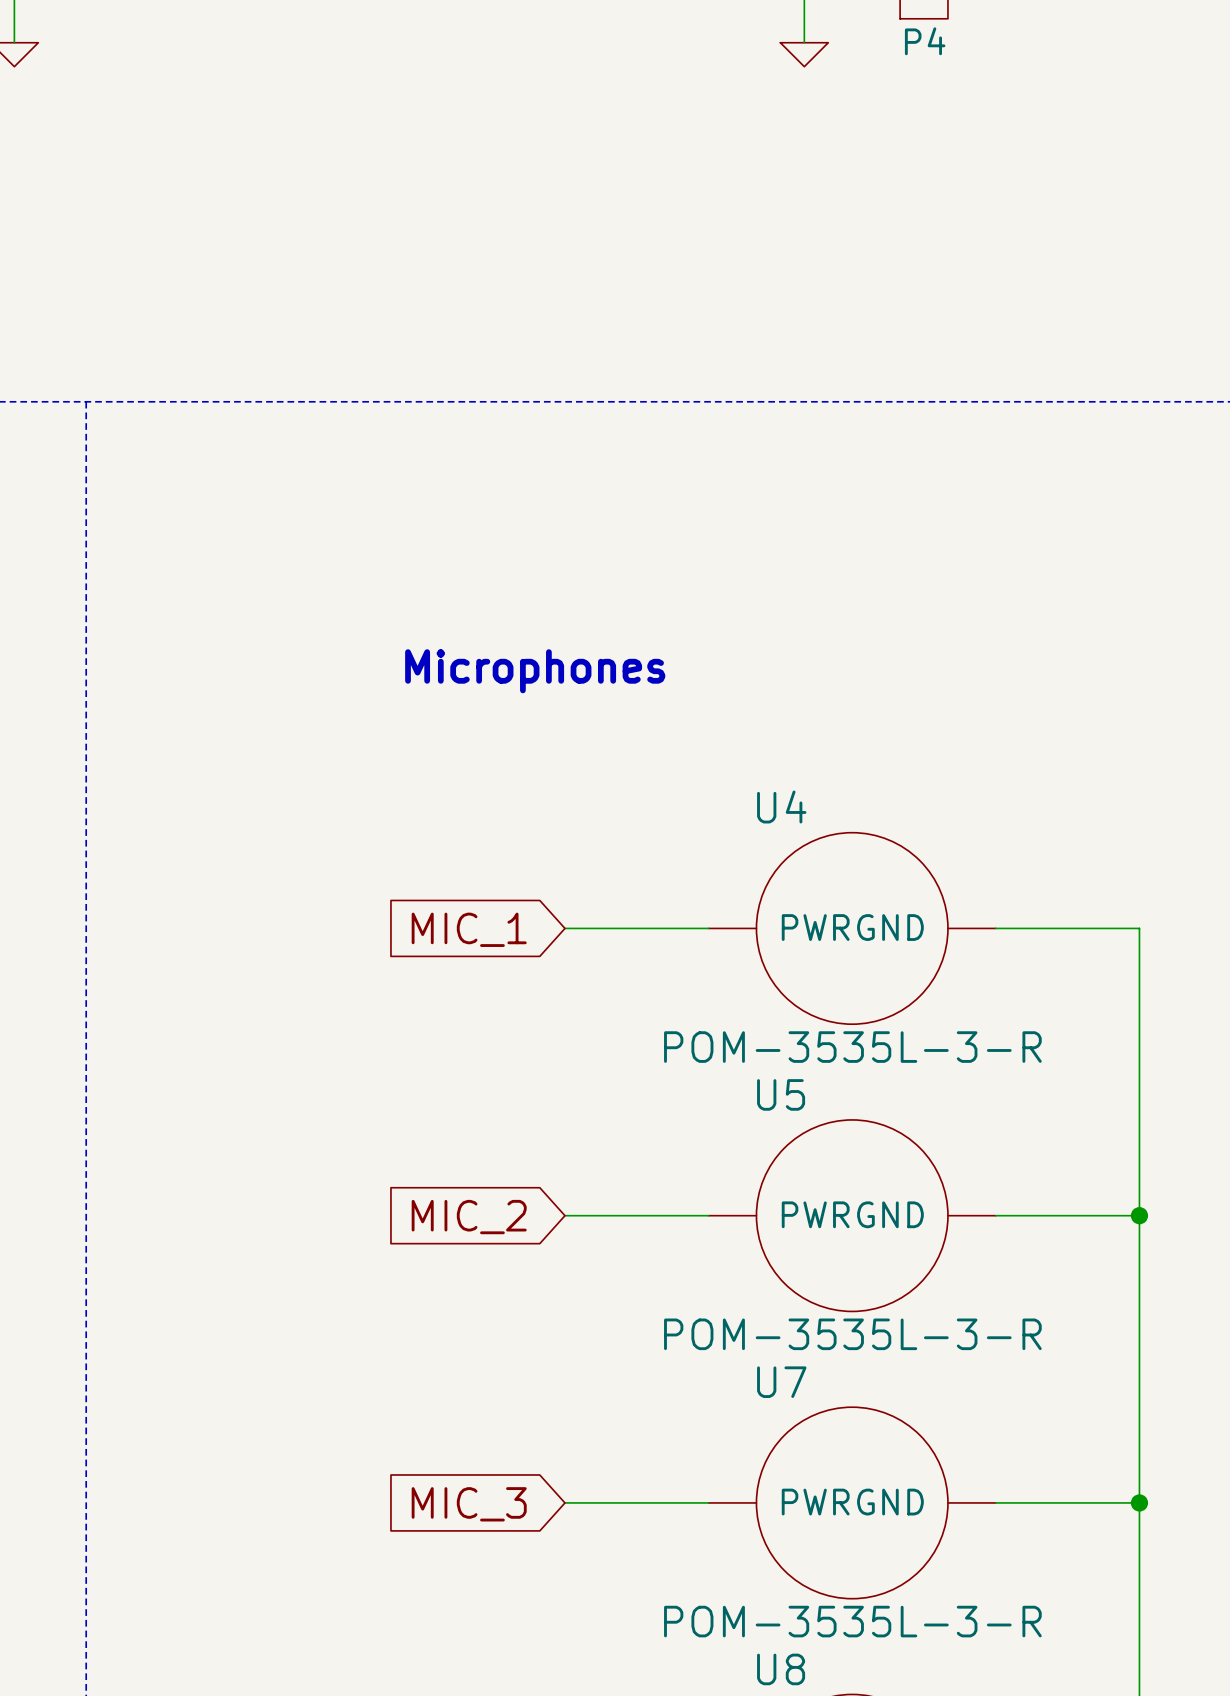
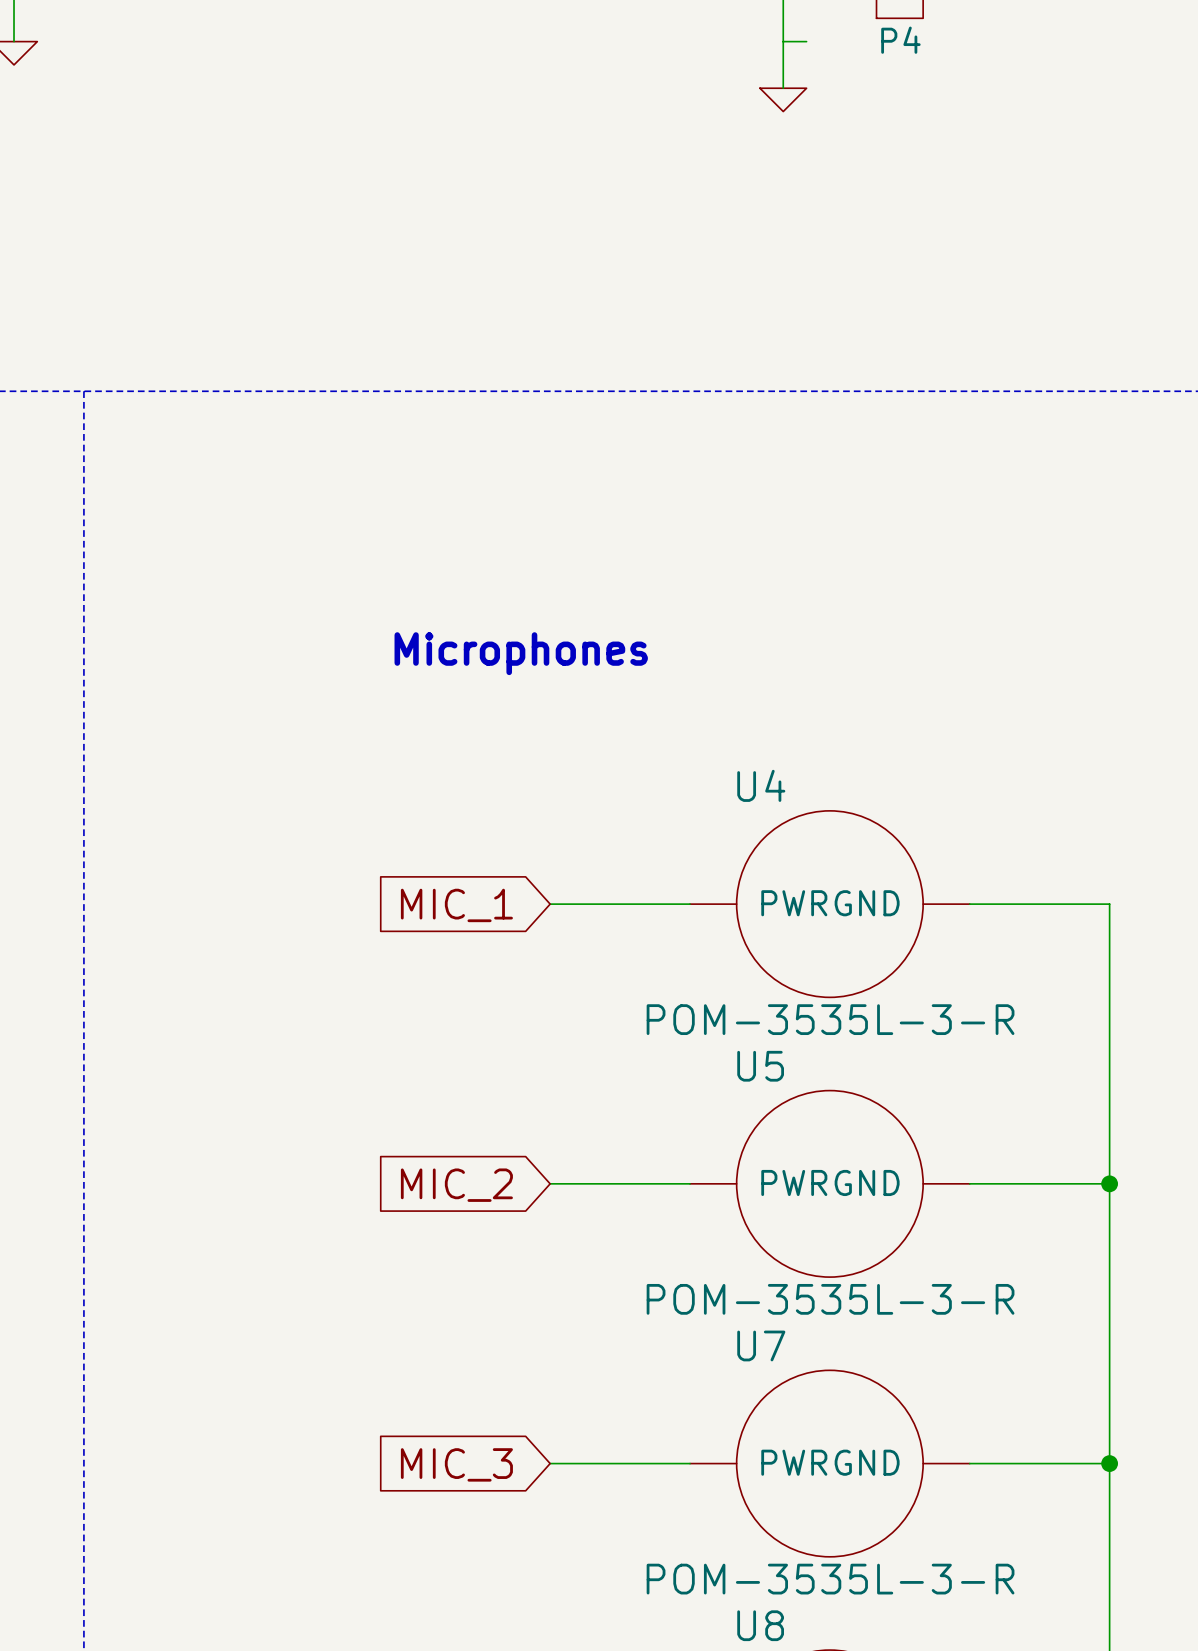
wire: none -> (806, 41) (783, 41) (783, 88)
power symbol position: (804, 54) -> (783, 99)

